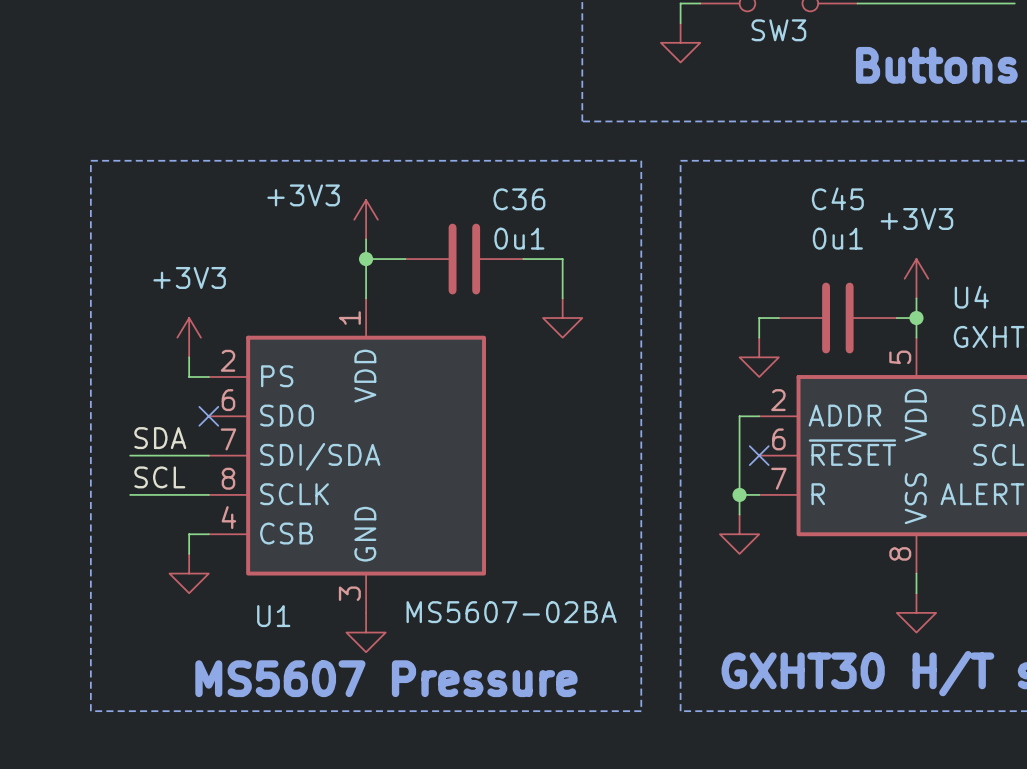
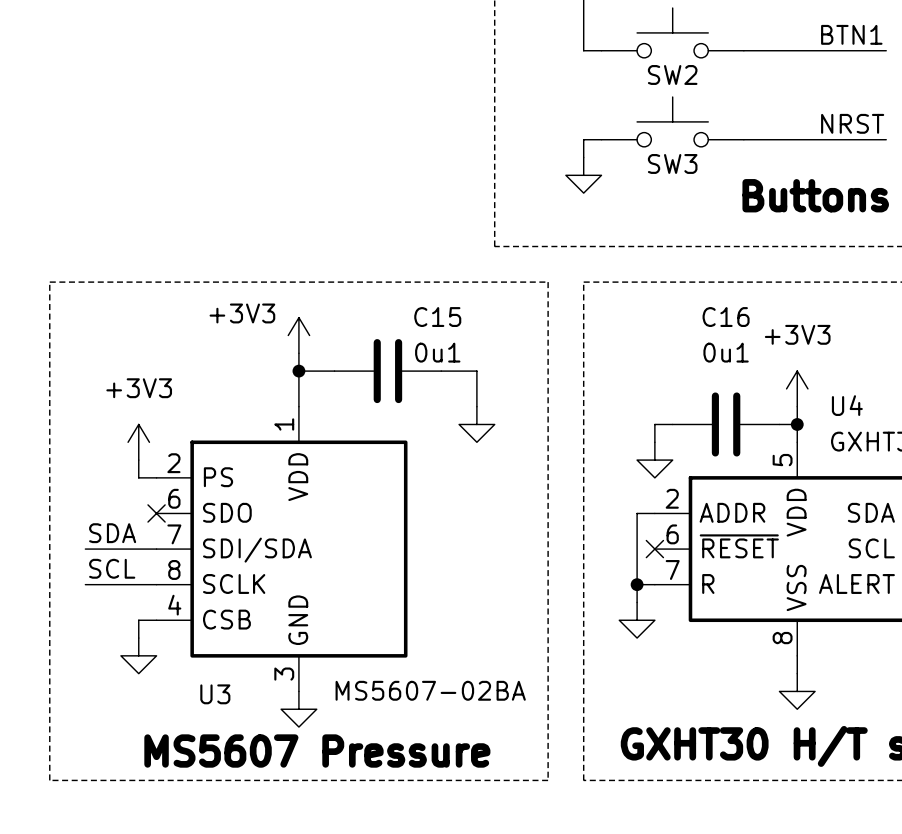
C45 name: C45 (837, 198) -> C16 (726, 317)
C36 name: C36 (519, 199) -> C15 (437, 317)
U1 name: U1 (273, 616) -> U3 (215, 694)

